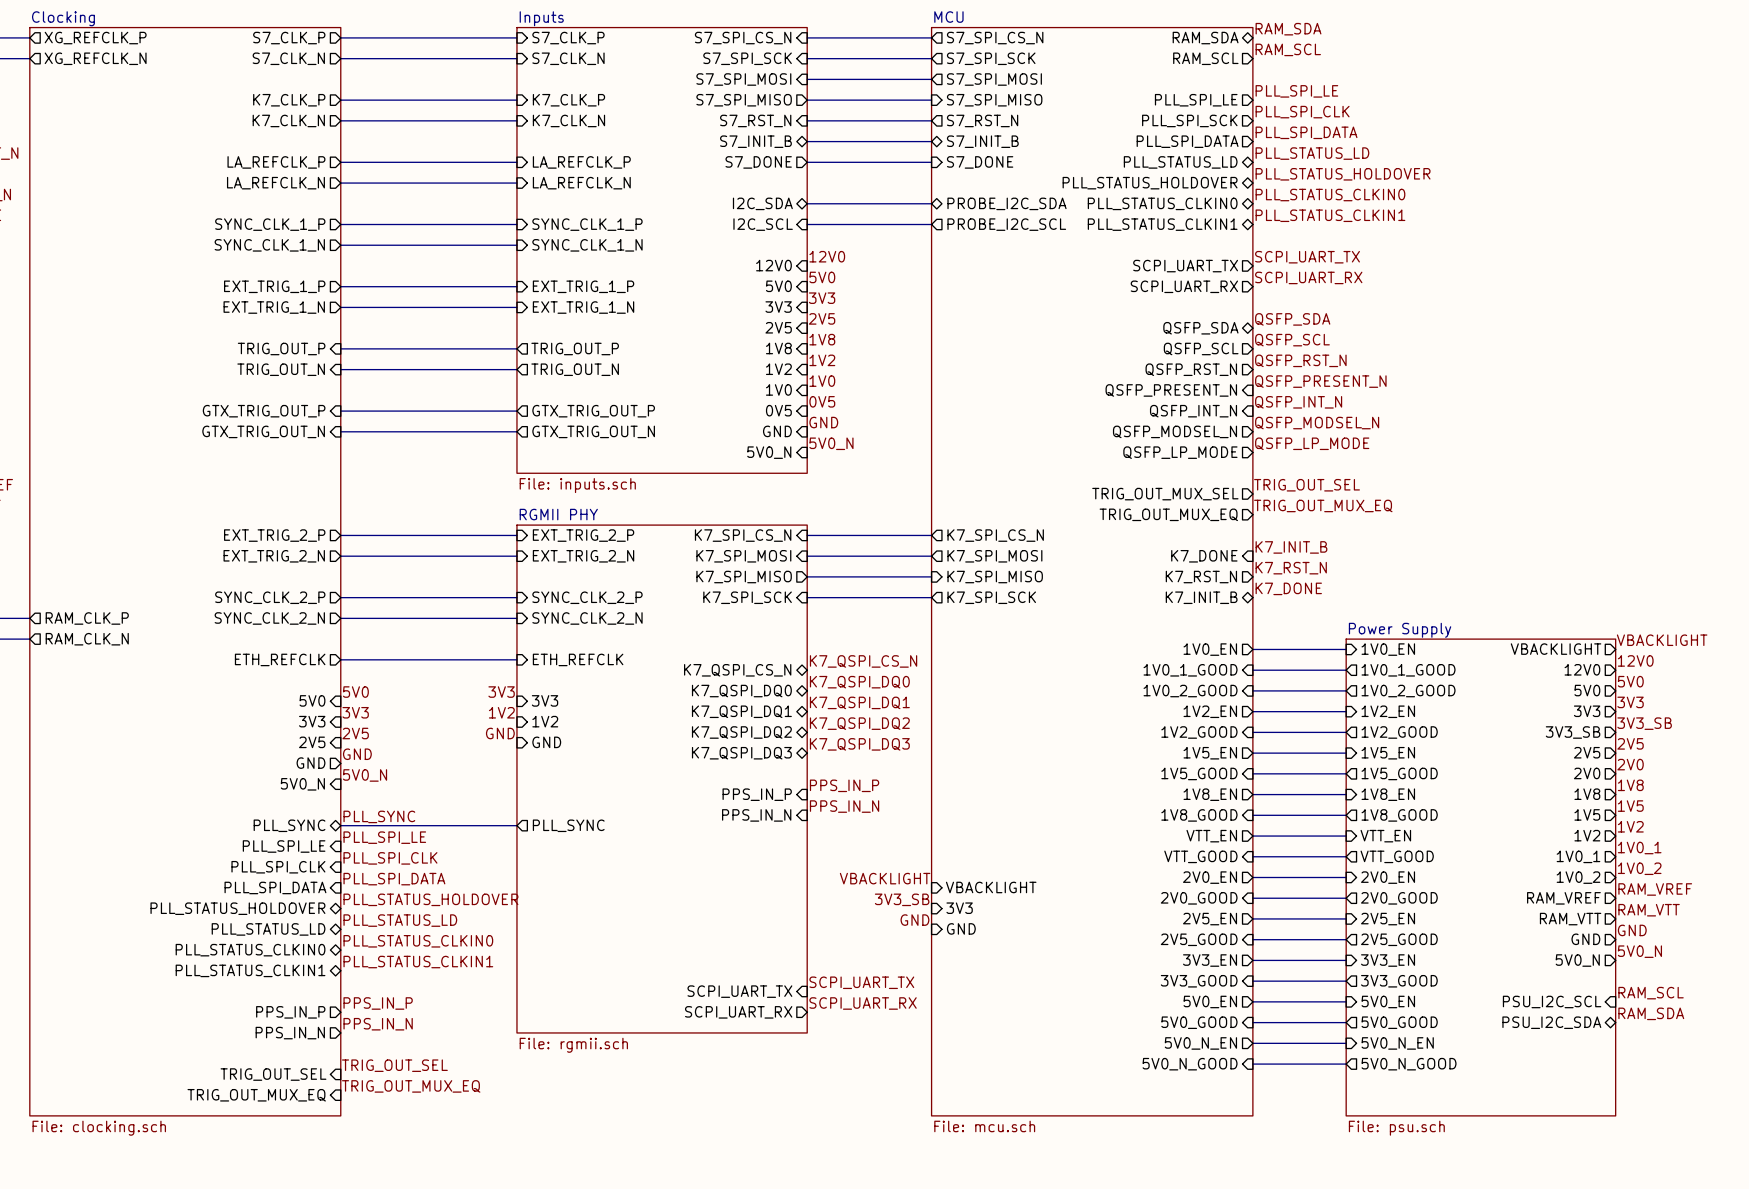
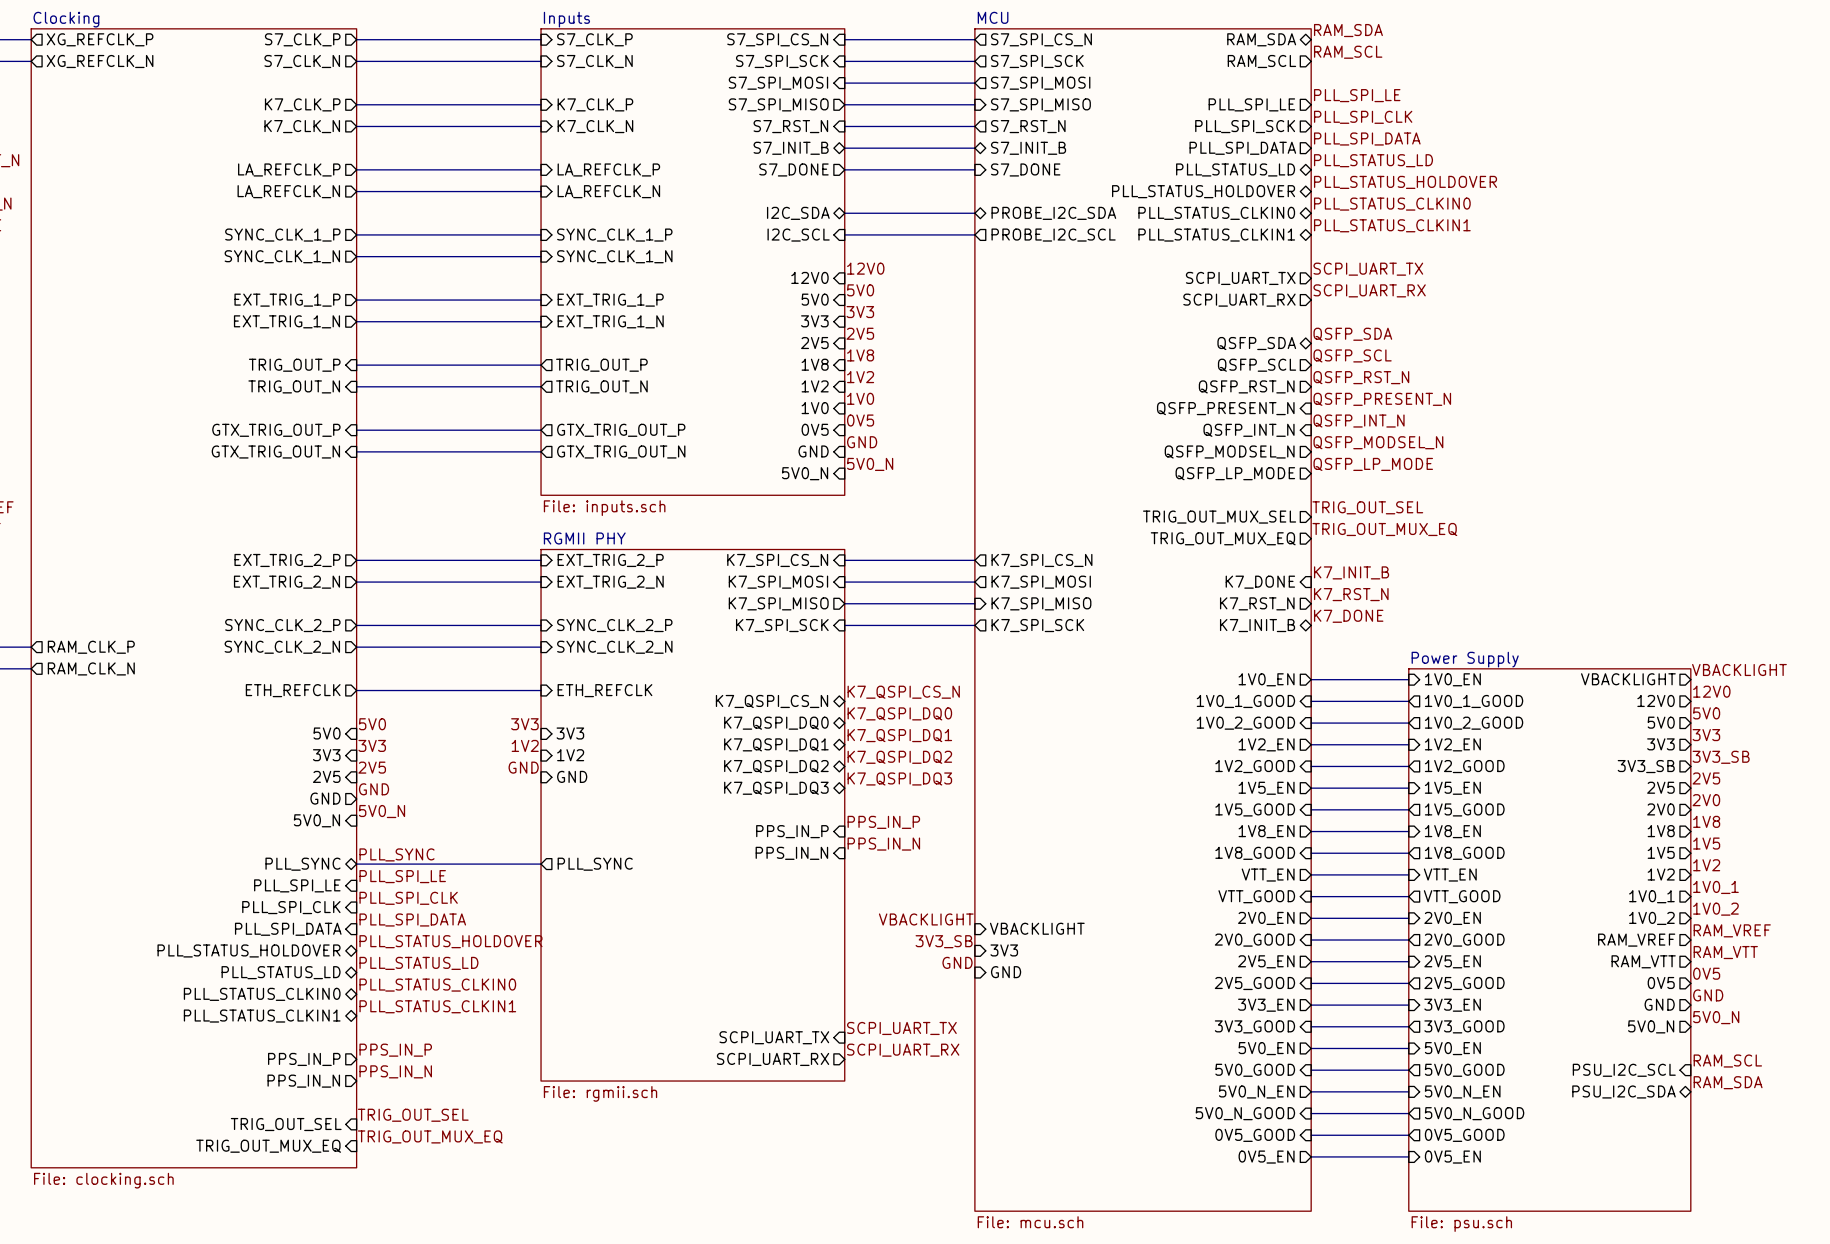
sheet MCU: File: mcu.sch (1092, 571) -> none
sheet MCU: none -> File: mcu.sch (1143, 620)
sheet Power Supply: File: psu.sch (1480, 877) -> none
sheet Power Supply: none -> File: psu.sch (1549, 940)
label: GND (1632, 930) -> 0V5 (1706, 973)
sheet pin: GND (1585, 939) -> 0V5 (1661, 982)
label: 5V0_N (1639, 951) -> GND (1708, 995)
sheet pin: 5V0_N (1577, 960) -> GND (1659, 1004)
label: none -> 5V0_N (1716, 1017)
sheet pin: none -> 5V0_N (1651, 1026)
label: RAM_SCL (1651, 993) -> none
sheet pin: PSU_I2C_SCL (1552, 1001) -> none
label: RAM_SDA (1651, 1013) -> RAM_SCL (1727, 1061)
sheet pin shape: bidirectional (1551, 1022) -> input (1624, 1070)
sheet pin: PSU_I2C_SDA (1551, 1022) -> PSU_I2C_SCL (1624, 1070)
label: none -> RAM_SDA (1728, 1082)
sheet pin: none -> PSU_I2C_SDA (1624, 1091)
sheet pin: none -> 0V5_GOOD (1255, 1135)
wire: none -> (1311, 1135) (1408, 1135)
sheet pin: none -> 0V5_GOOD (1464, 1135)
sheet pin: none -> 0V5_EN (1266, 1157)
wire: none -> (1311, 1156) (1408, 1156)
sheet pin: none -> 0V5_EN (1452, 1157)

